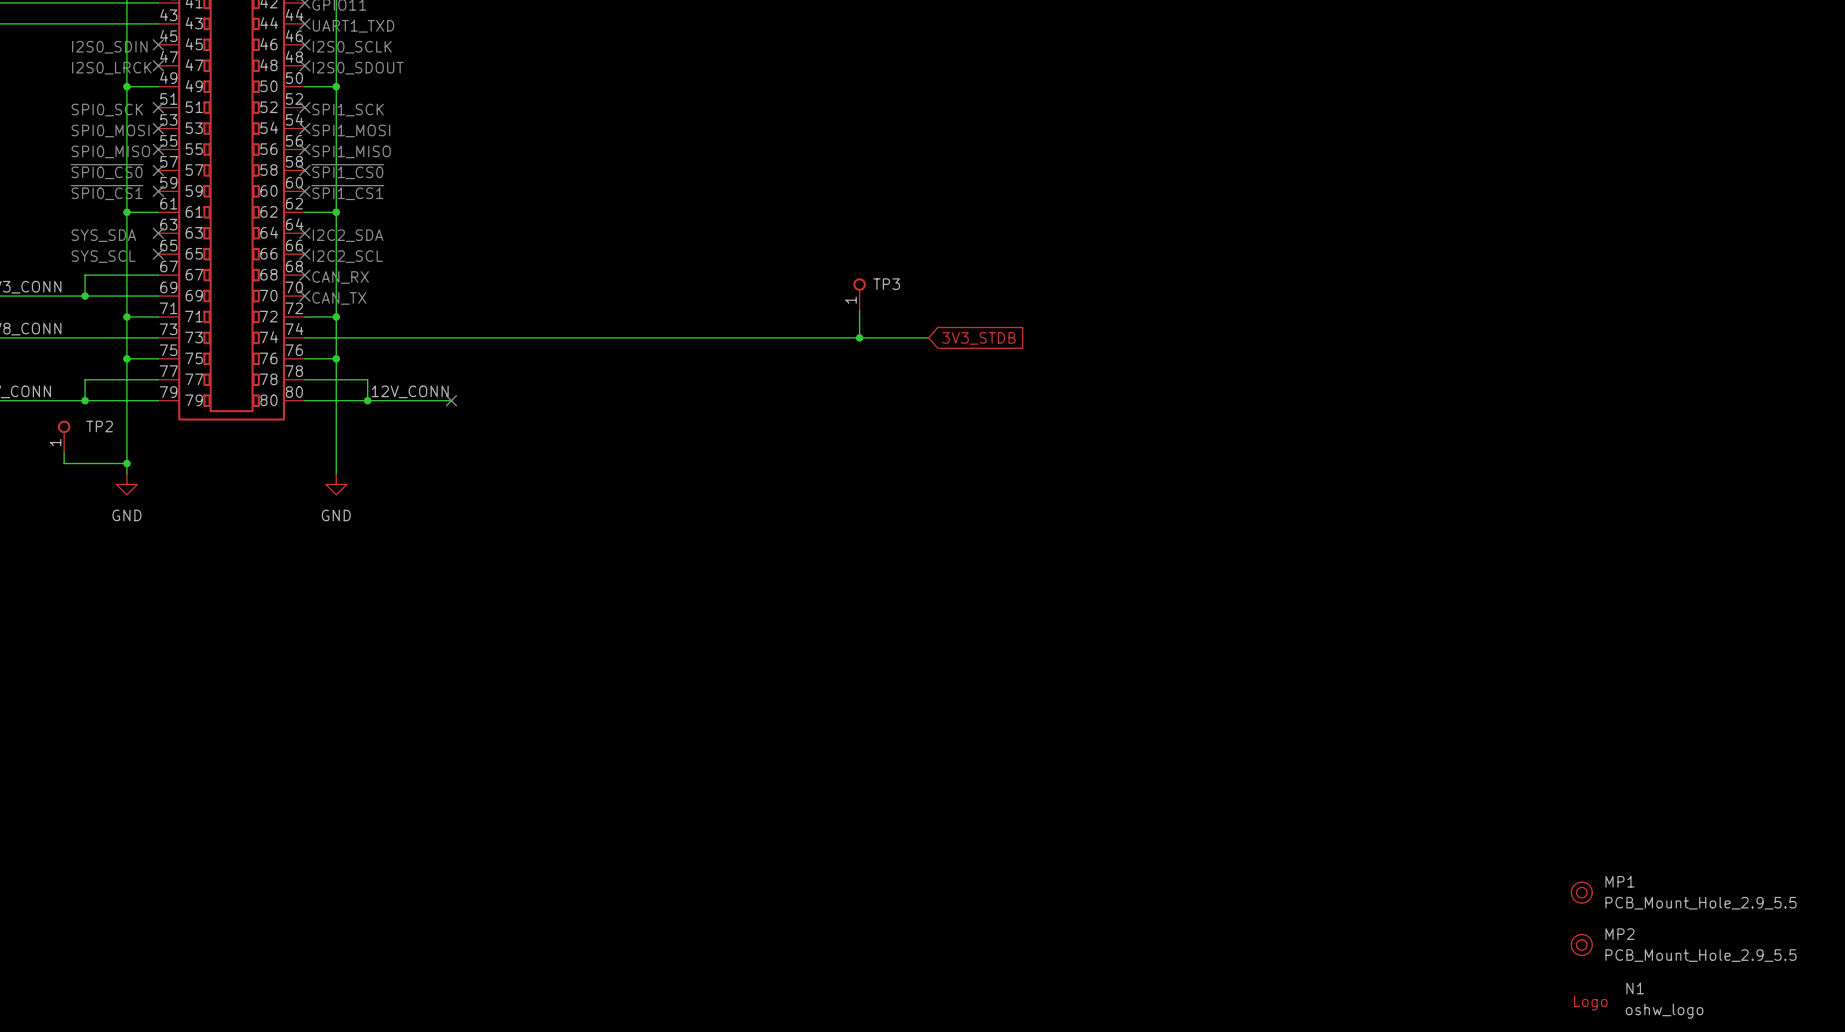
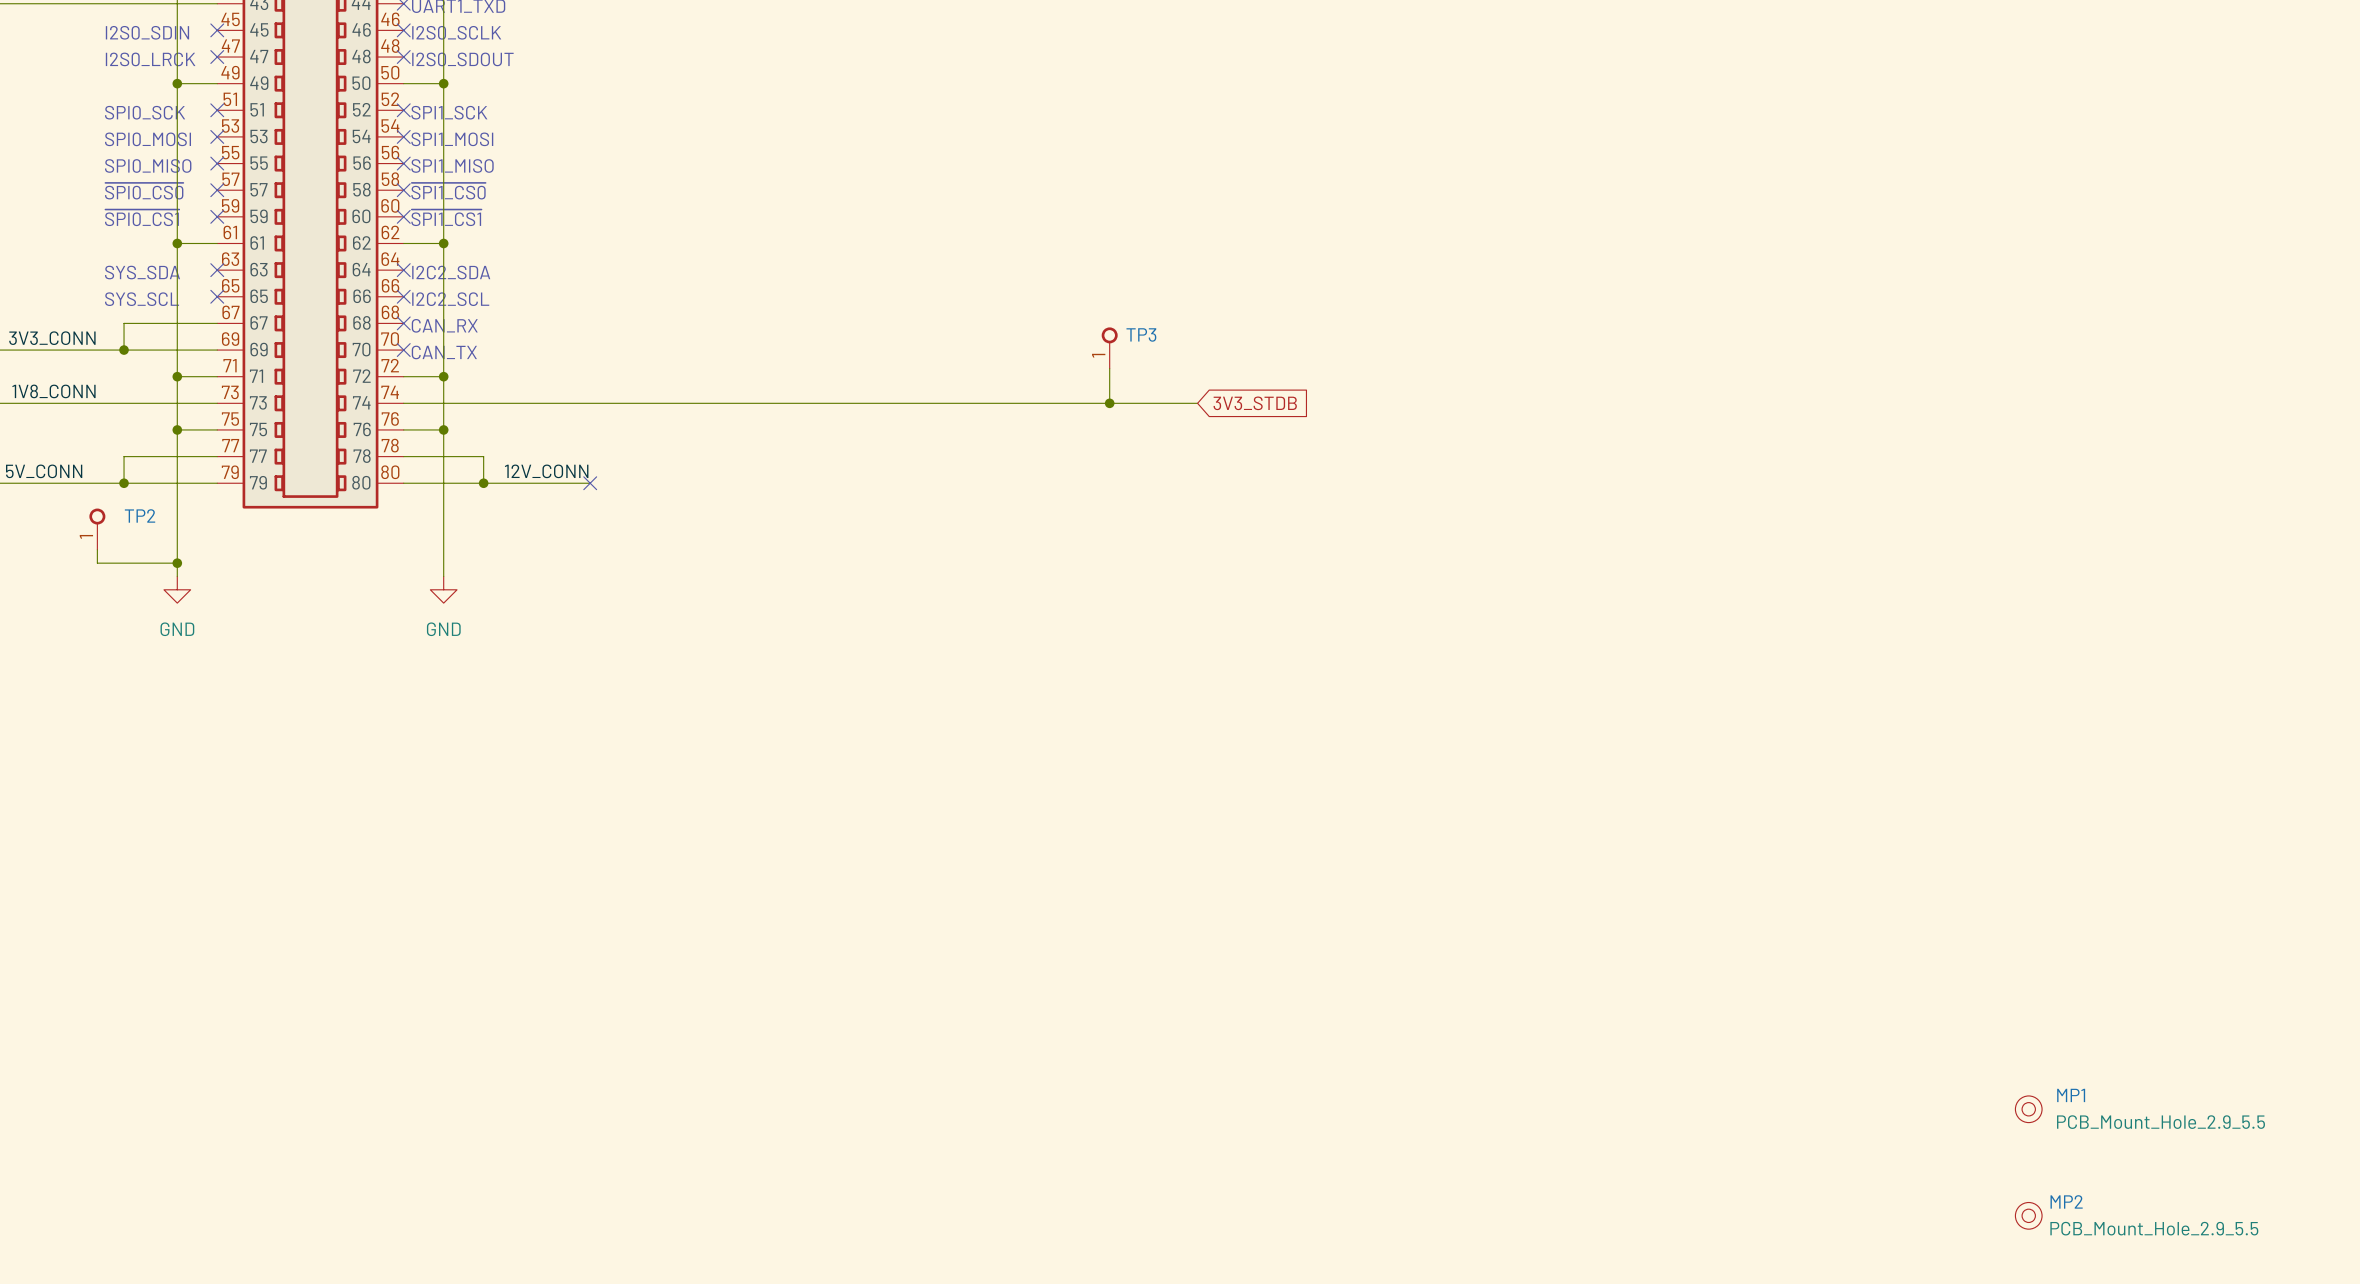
MP2 name position: MP2 (1619, 934) -> MP2 (2066, 1201)
MP2 position: (1581, 944) -> (2028, 1215)
MP2 value position: PCB_Mount_Hole_2.9_5.5 (1700, 955) -> PCB_Mount_Hole_2.9_5.5 (2154, 1228)
N1: oshw_logo (1638, 1000) -> none

